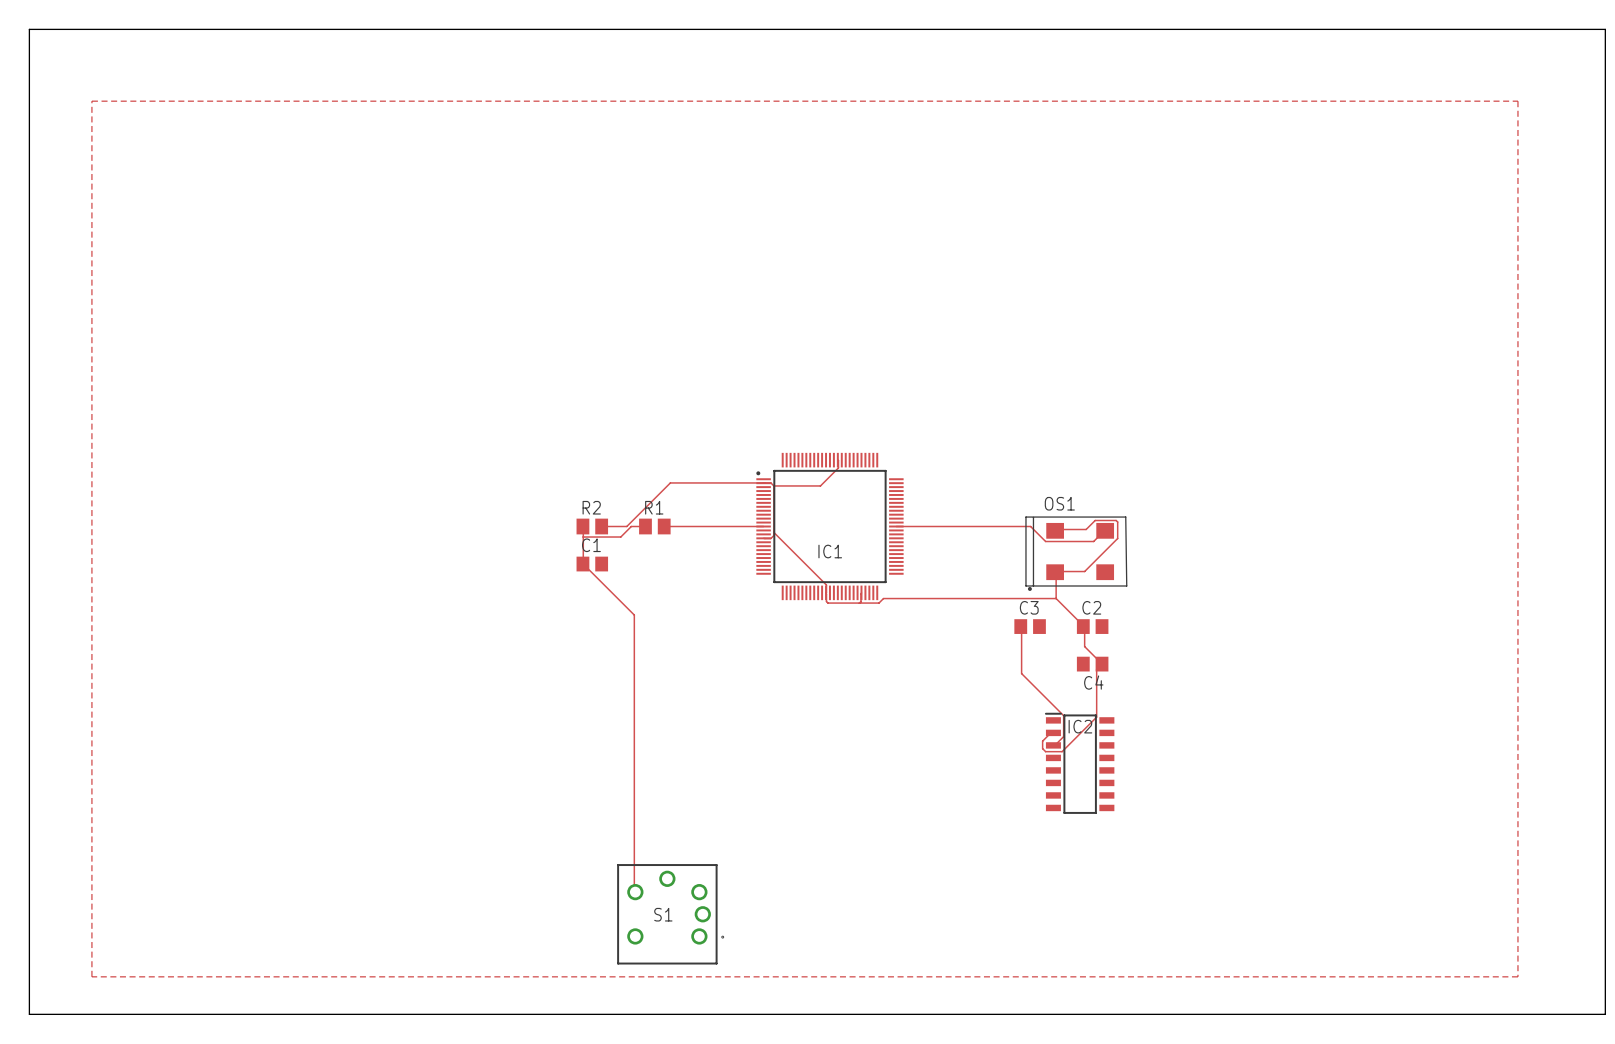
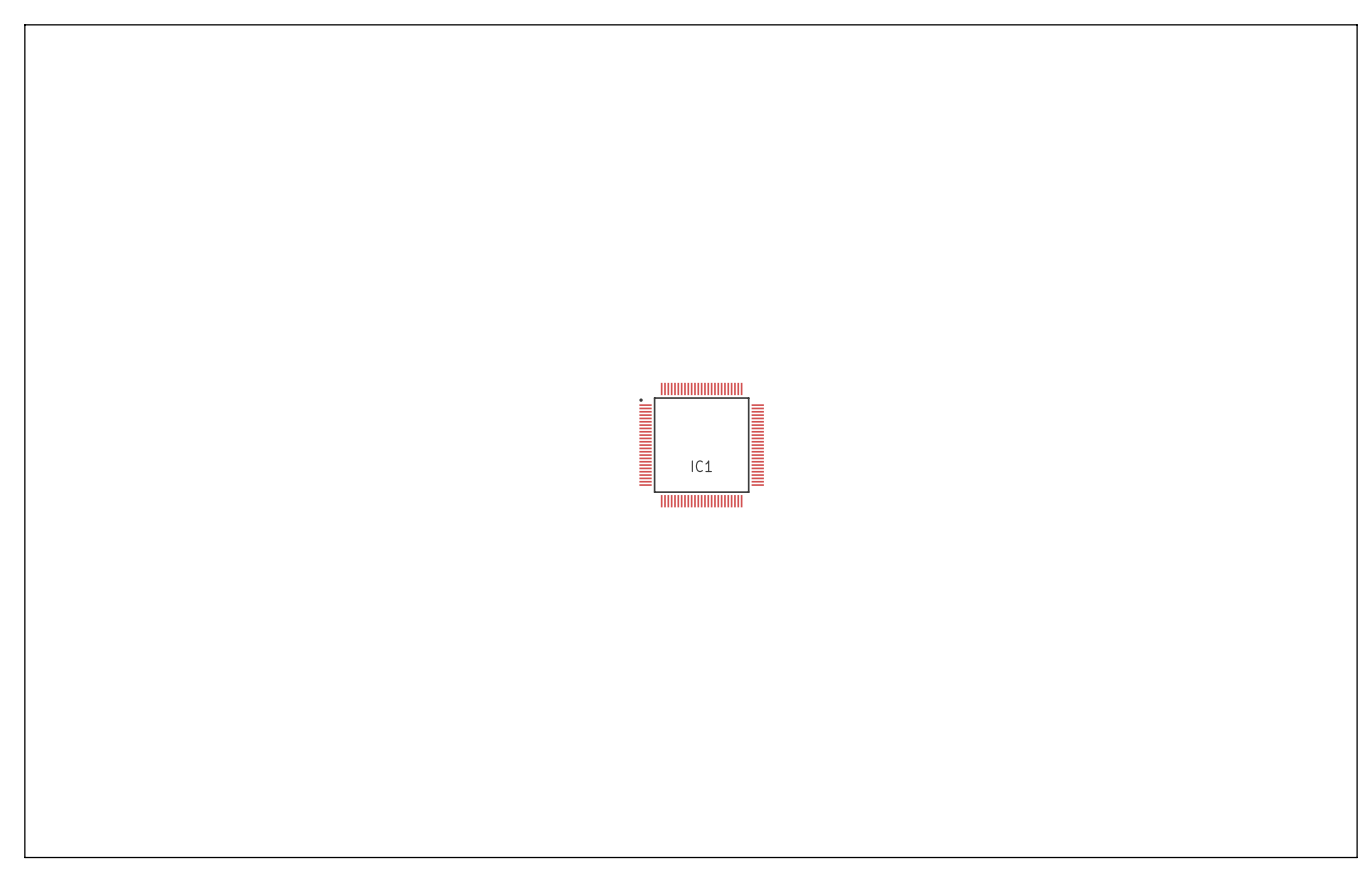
zone outline: (91, 101) (1517, 101) (1517, 976) (91, 976) (91, 101) -> none
track: (837, 460) (838, 467) (820, 485) (773, 485) -> none
track: (773, 485) (773, 535) (770, 538) (763, 538) -> none
track: (773, 485) (770, 482) (670, 482) (626, 526) (601, 526) -> none
track: (582, 526) (583, 564) -> none
R2: (592, 526) -> none
track: (645, 526) (631, 526) (620, 537) (583, 537) -> none
R1: (654, 526) -> none
track: (664, 526) (763, 526) -> none
track: (896, 526) (1030, 526) (1045, 541) (1093, 541) (1105, 530) -> none
track: (1055, 530) (1086, 529) (1095, 520) (1117, 522) (1117, 538) (1084, 571) (1055, 572) (1056, 598) -> none
track: (773, 532) (826, 585) (827, 603) (879, 603) (883, 598) (1056, 598) -> none
OS1: (1076, 553) -> none
track: (583, 564) (634, 615) (635, 892) -> none
C1: (592, 564) -> none
track: (861, 592) (859, 603) -> none
track: (1056, 598) (1084, 627) (1084, 646) (1102, 664) (1096, 669) (1096, 717) (1062, 751) (1045, 751) (1042, 748) (1042, 741) (1053, 732) -> none
track: (1020, 626) (1021, 673) (1063, 715) (1063, 736) (1053, 745) -> none
C3: (1030, 626) -> none
C2: (1092, 626) -> none
C4: (1092, 664) -> none
IC2: (1079, 763) -> none
S1: (670, 914) -> none

